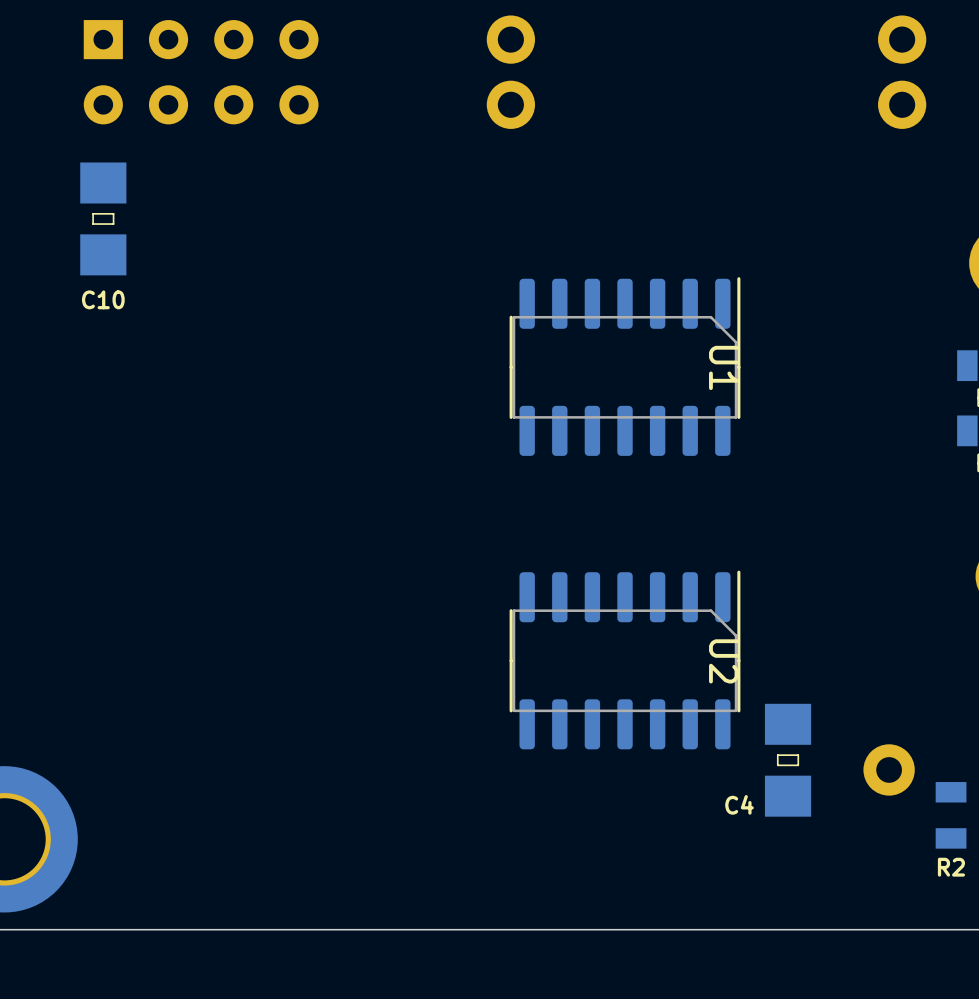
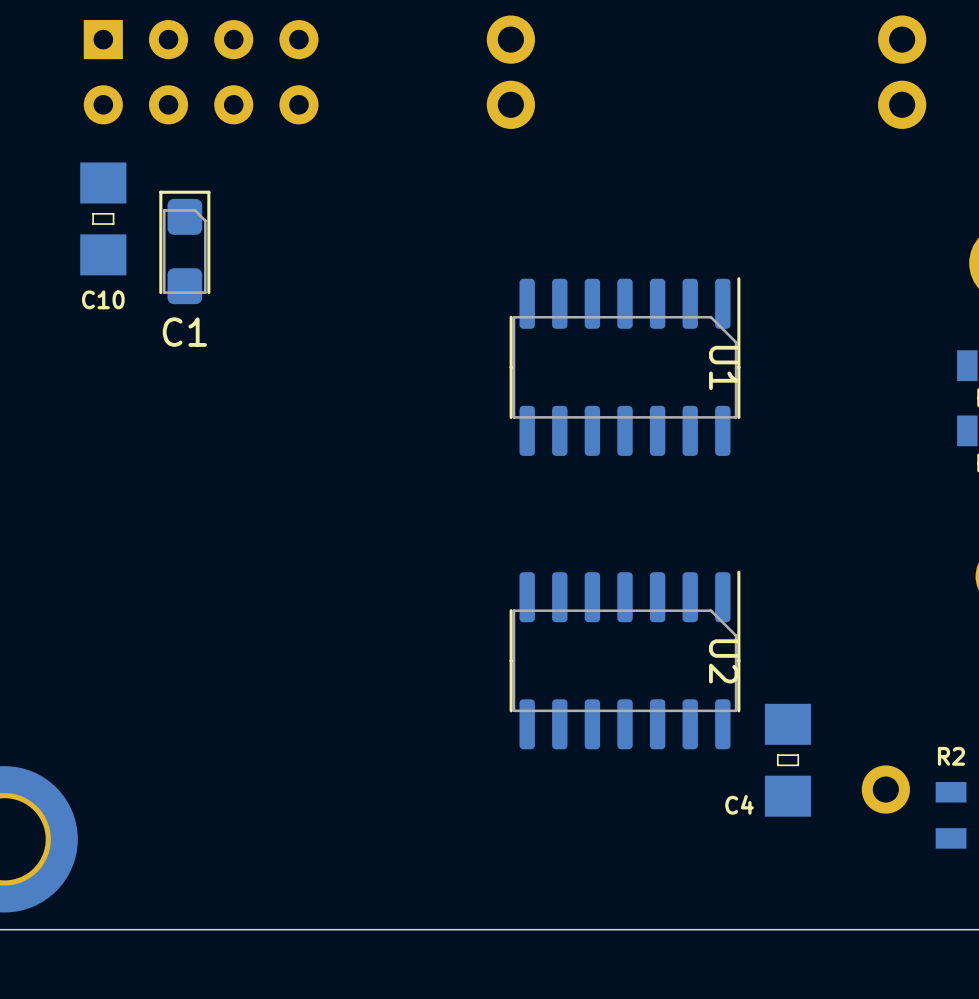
C1: none -> (184, 247)
part footprint: [863, 744, 915, 796] -> [861, 765, 910, 814]
R2 name position: R2 (951, 867) -> R2 (951, 756)

